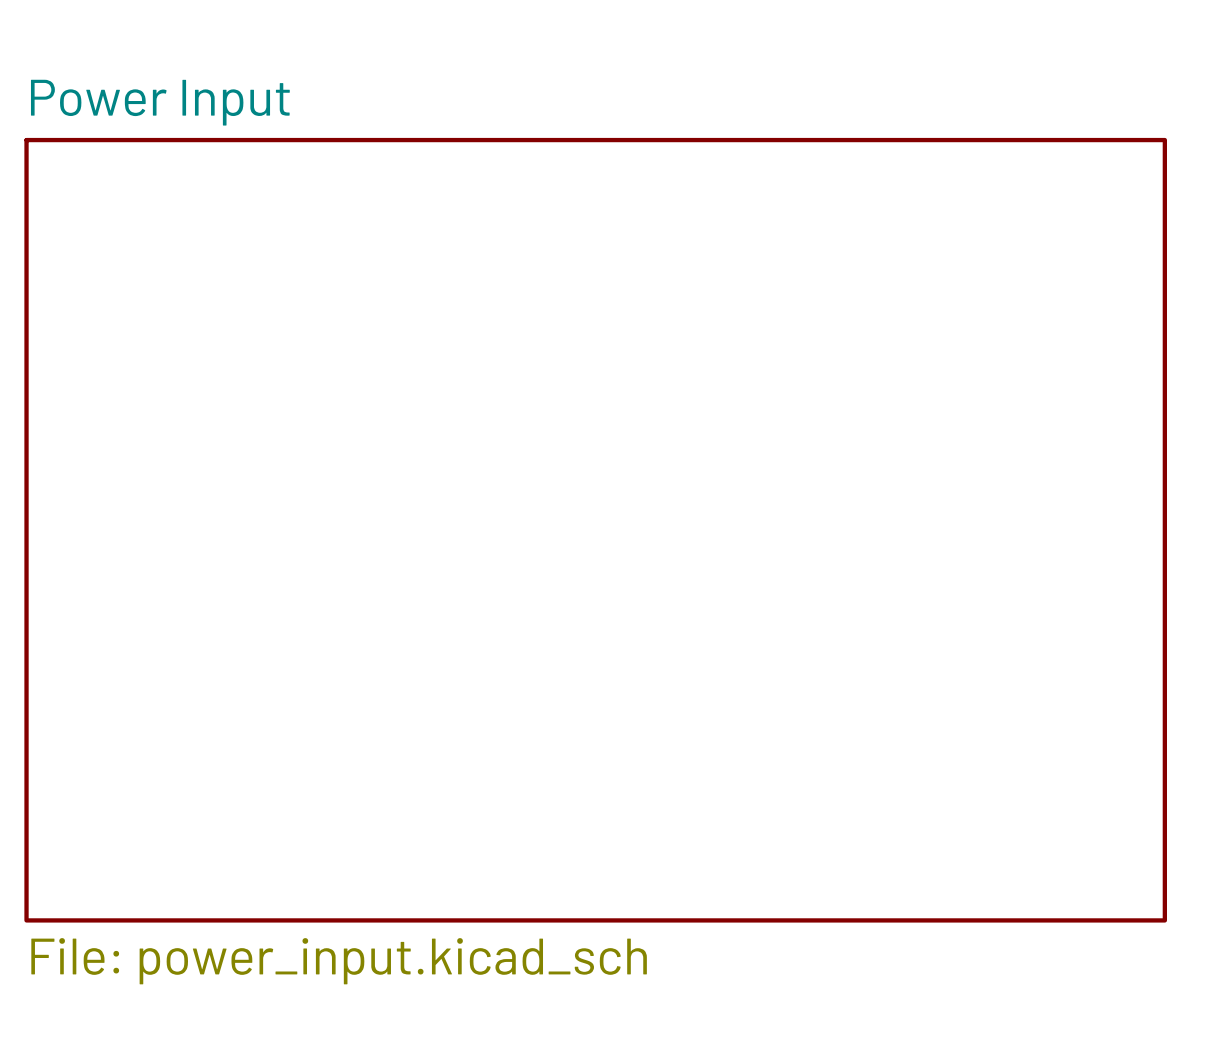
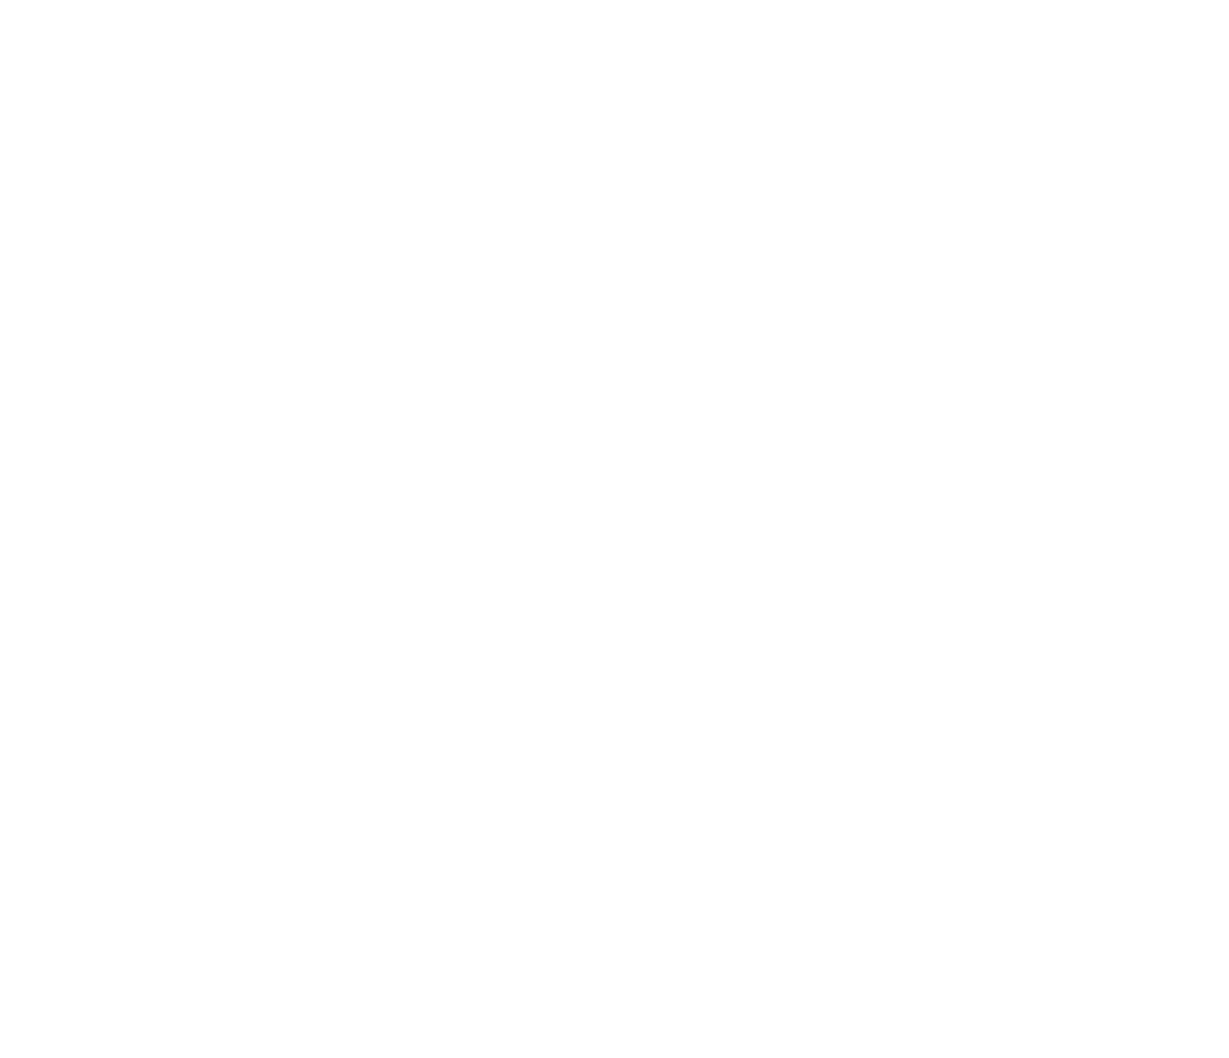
sheet Power Input: File: power_input.kicad_sch (595, 530) -> none

